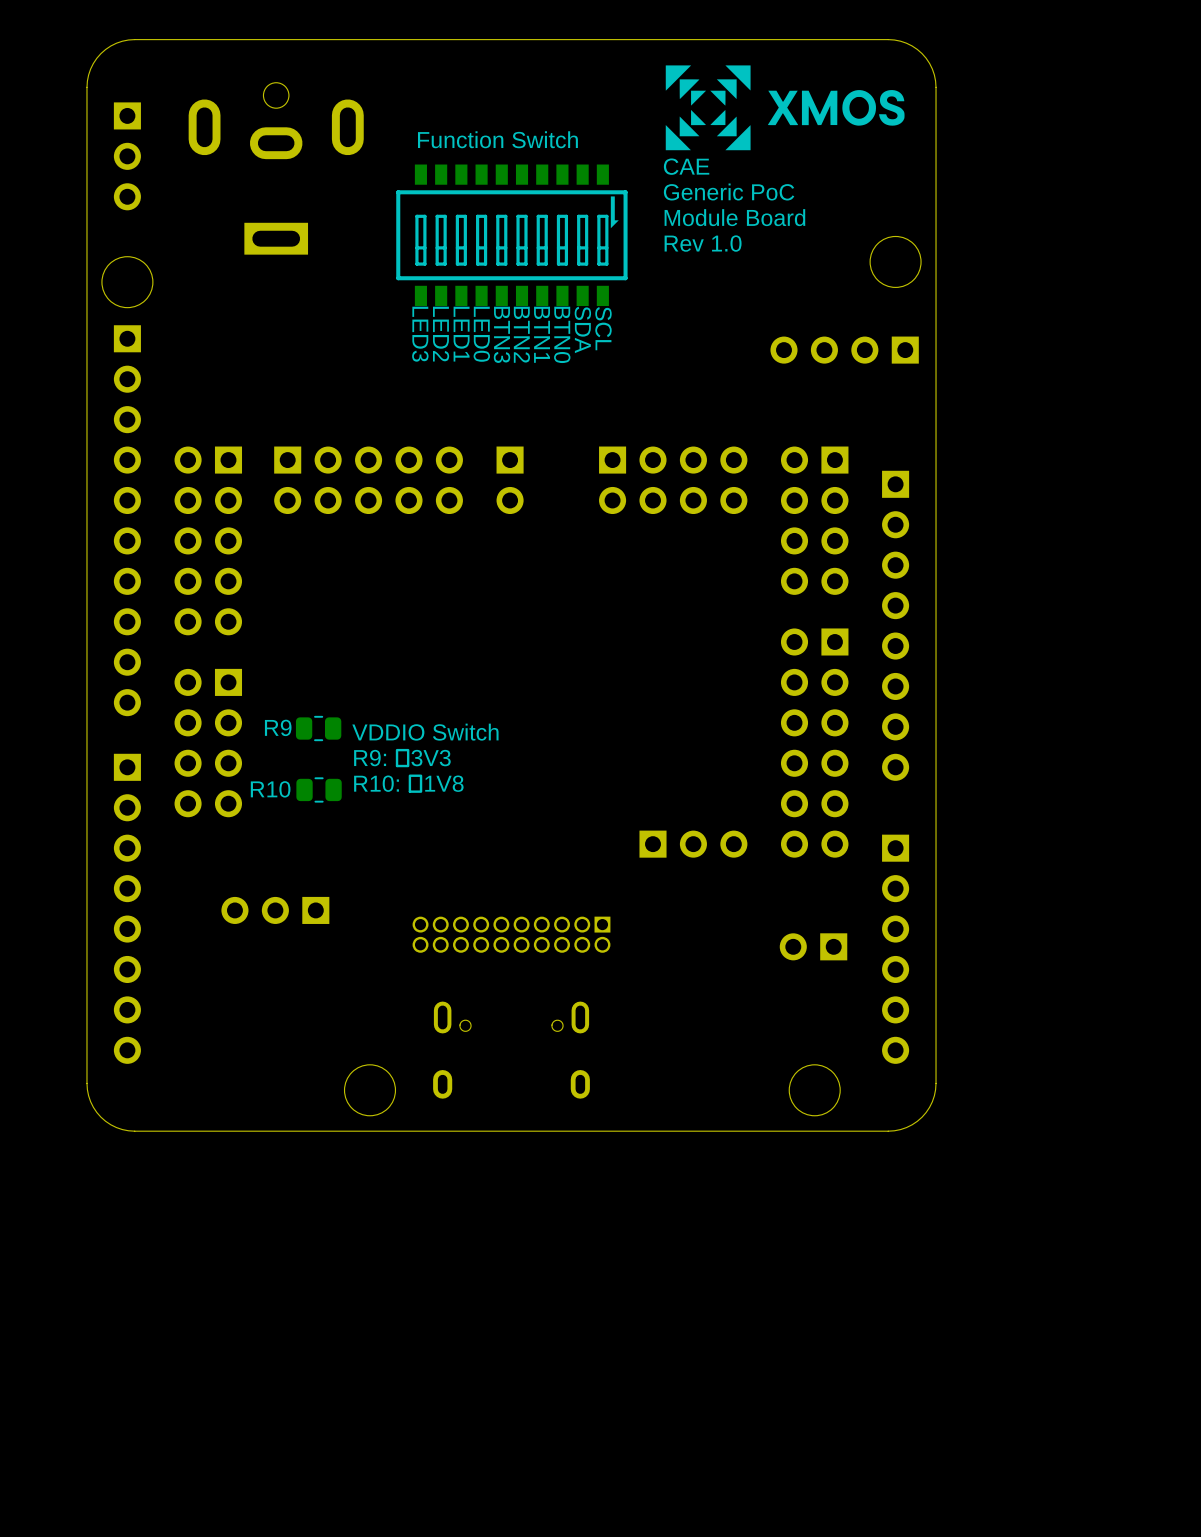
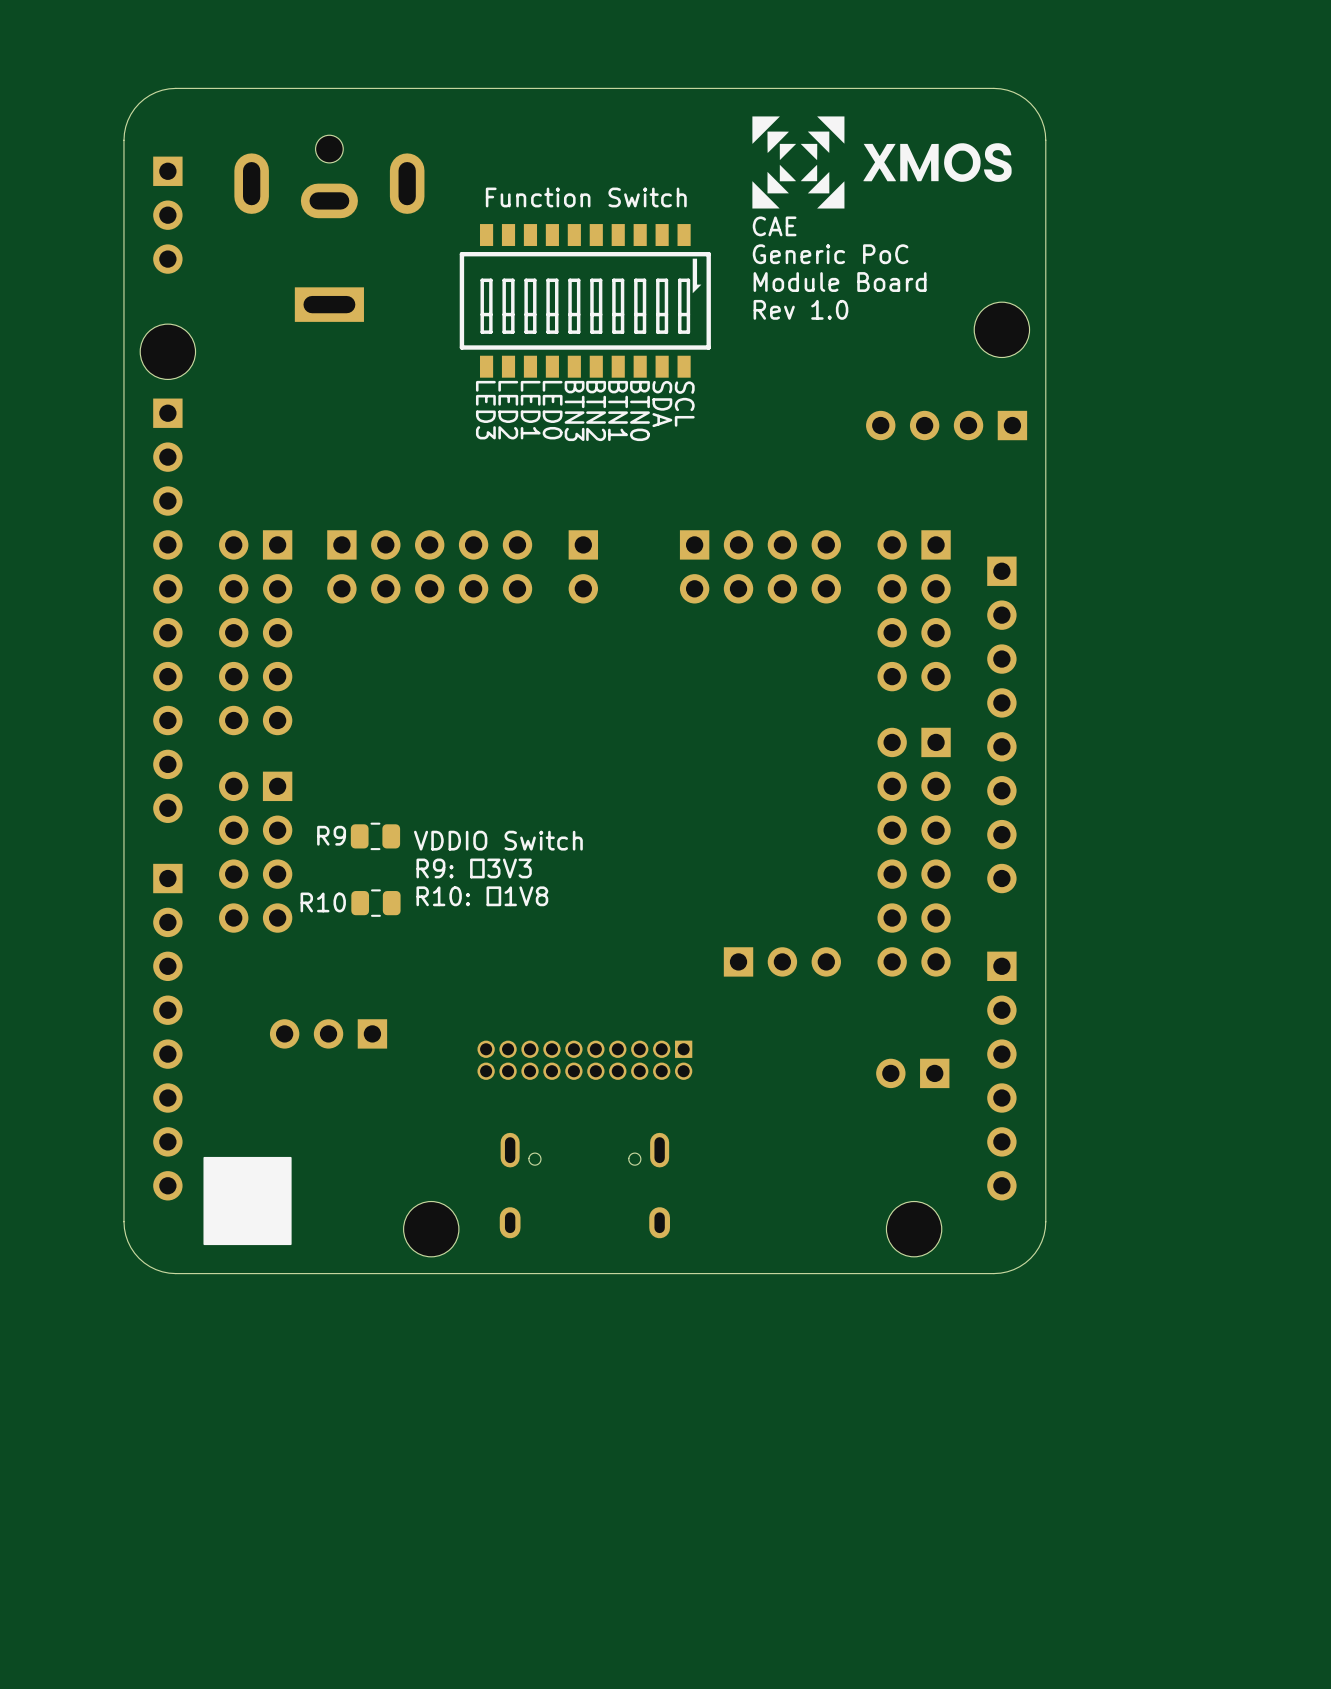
drawing: none -> [203, 1156, 292, 1246]

